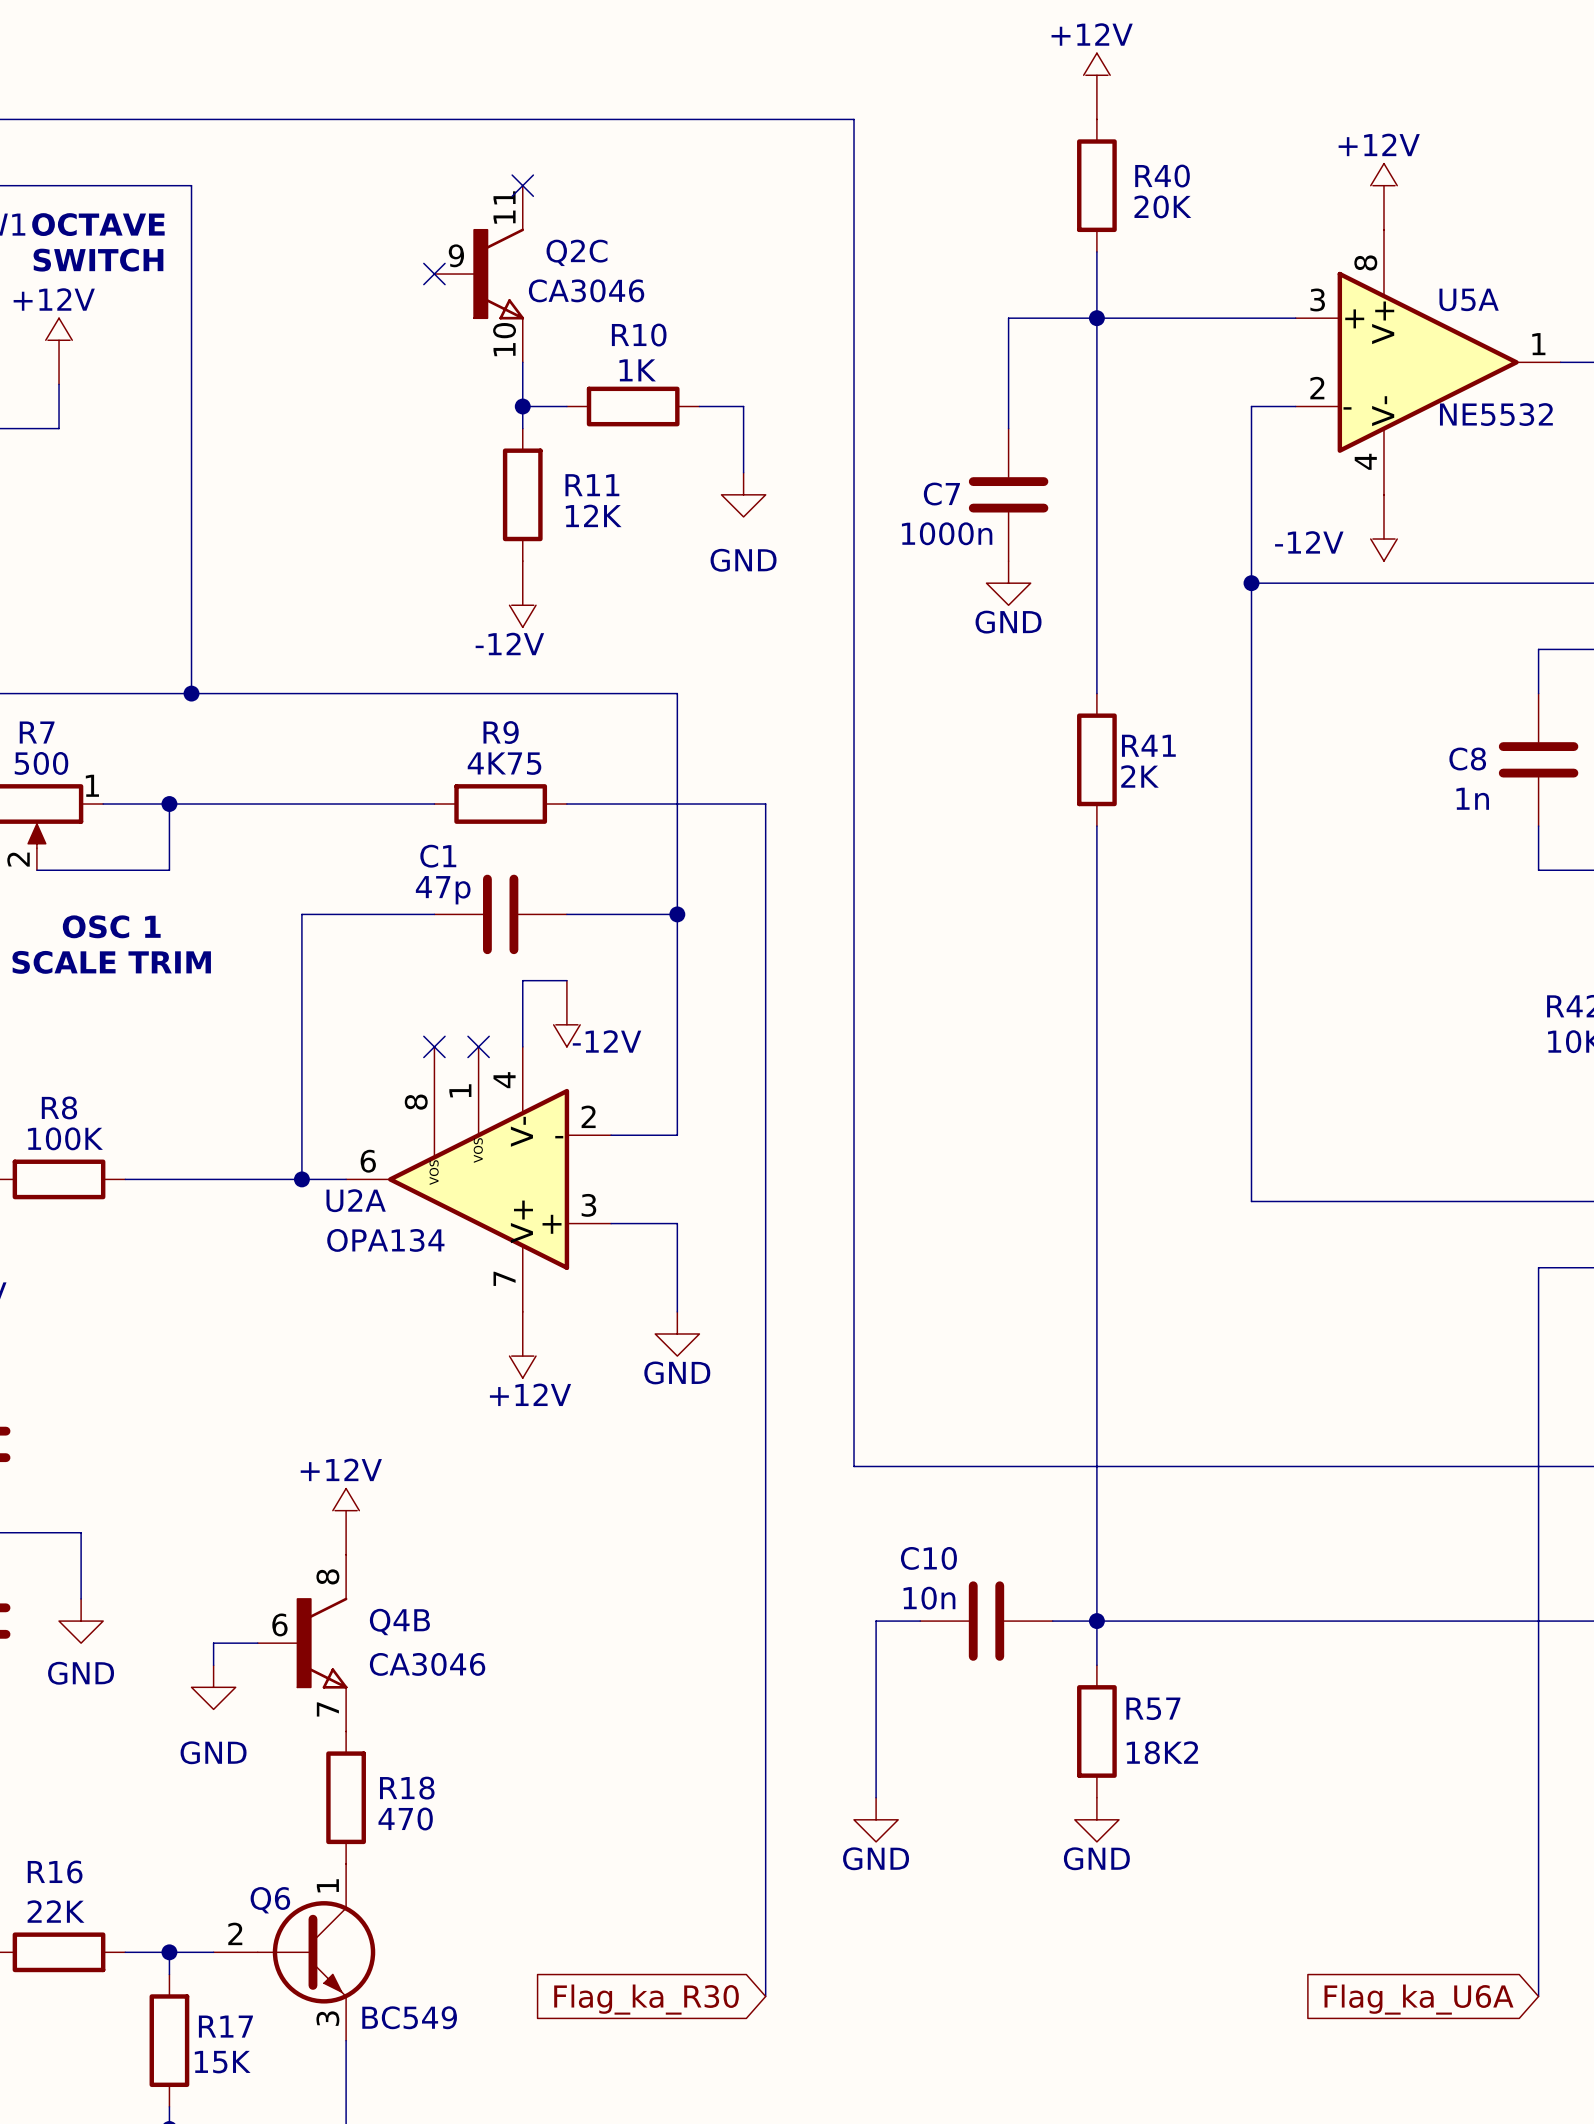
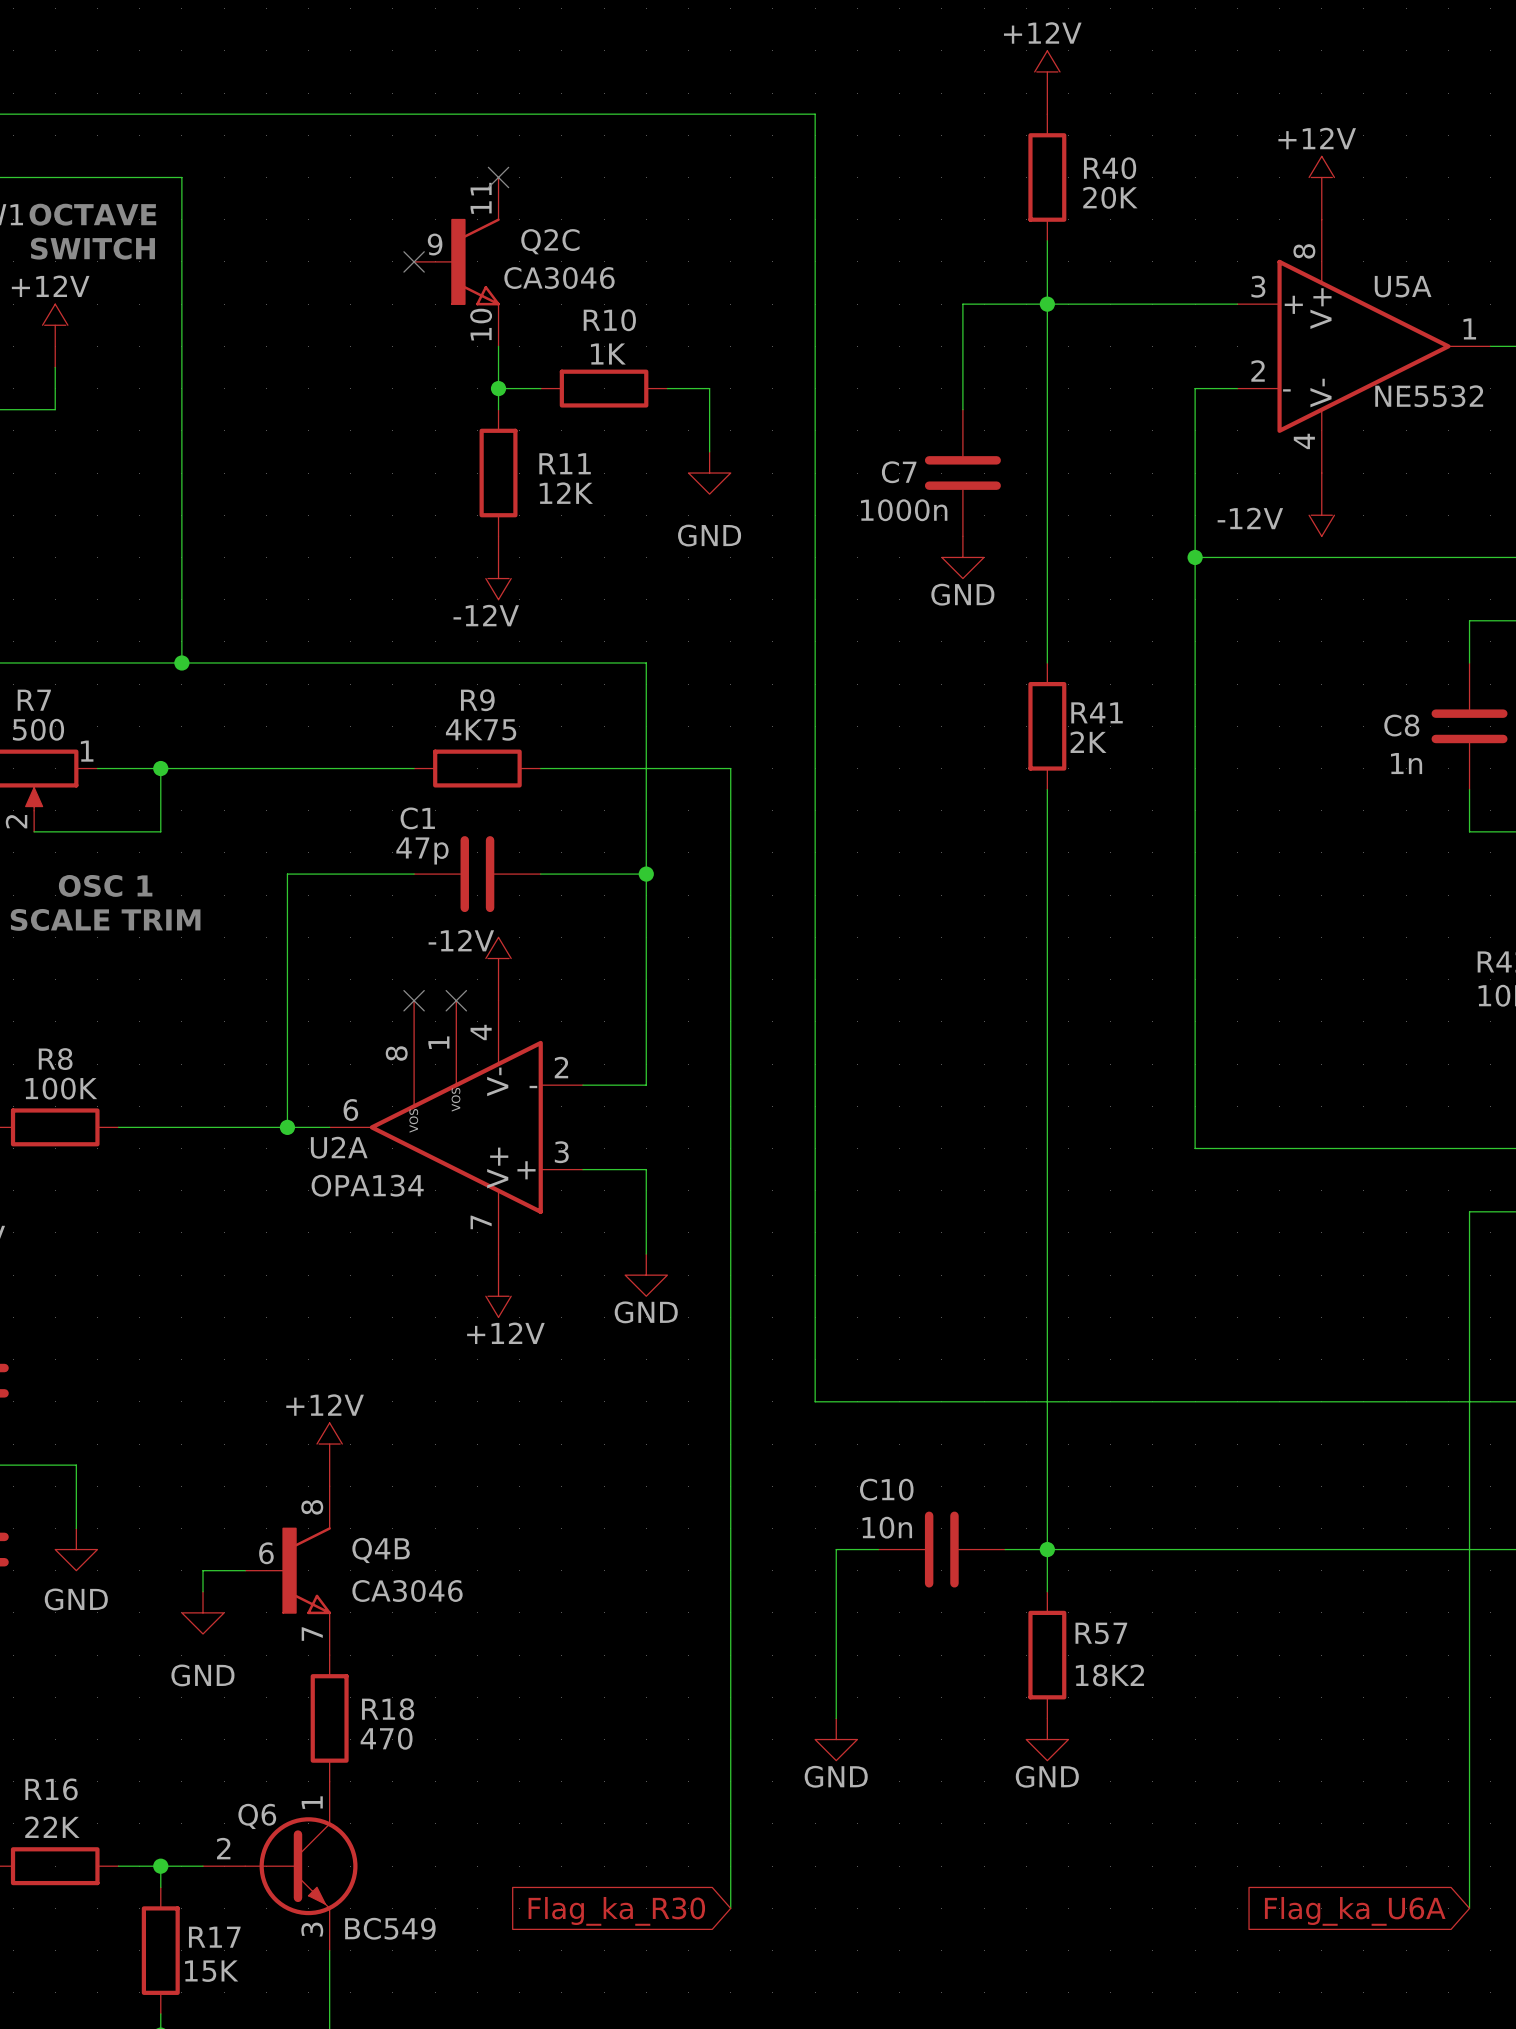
wire: (566, 980) (522, 980) (522, 1046) -> none
part position: (566, 1013) -> (498, 969)
part rotation: 0° (566, 1035) -> 180° (498, 947)

